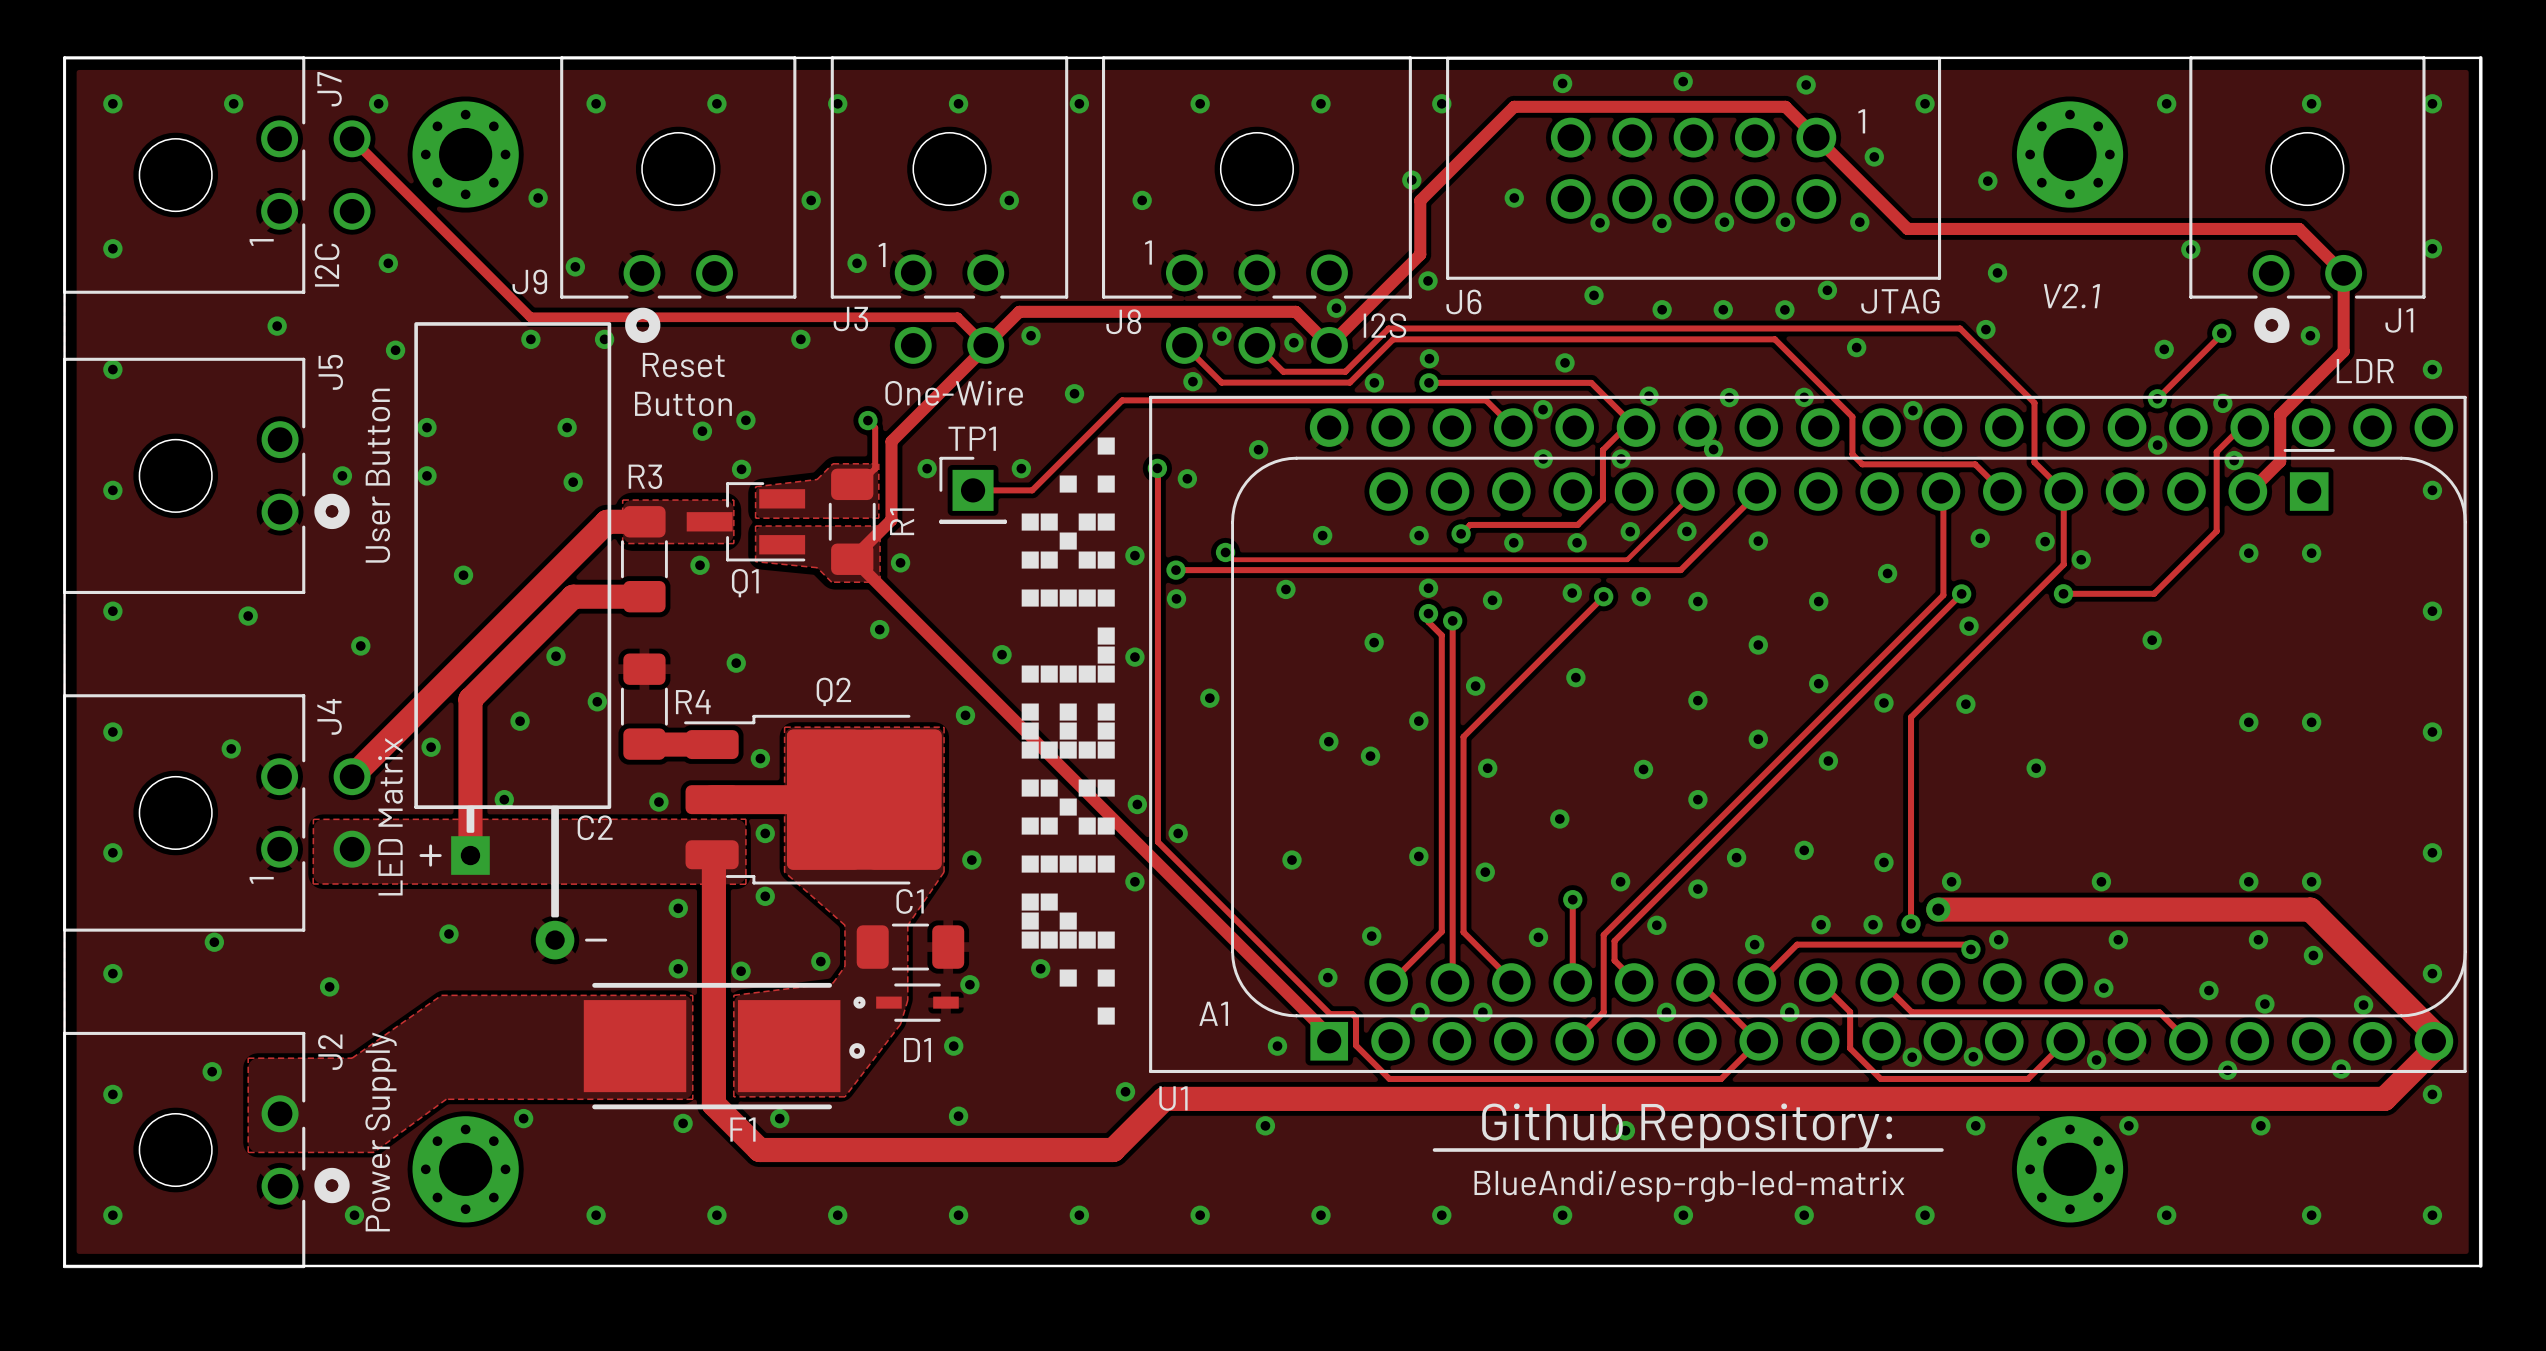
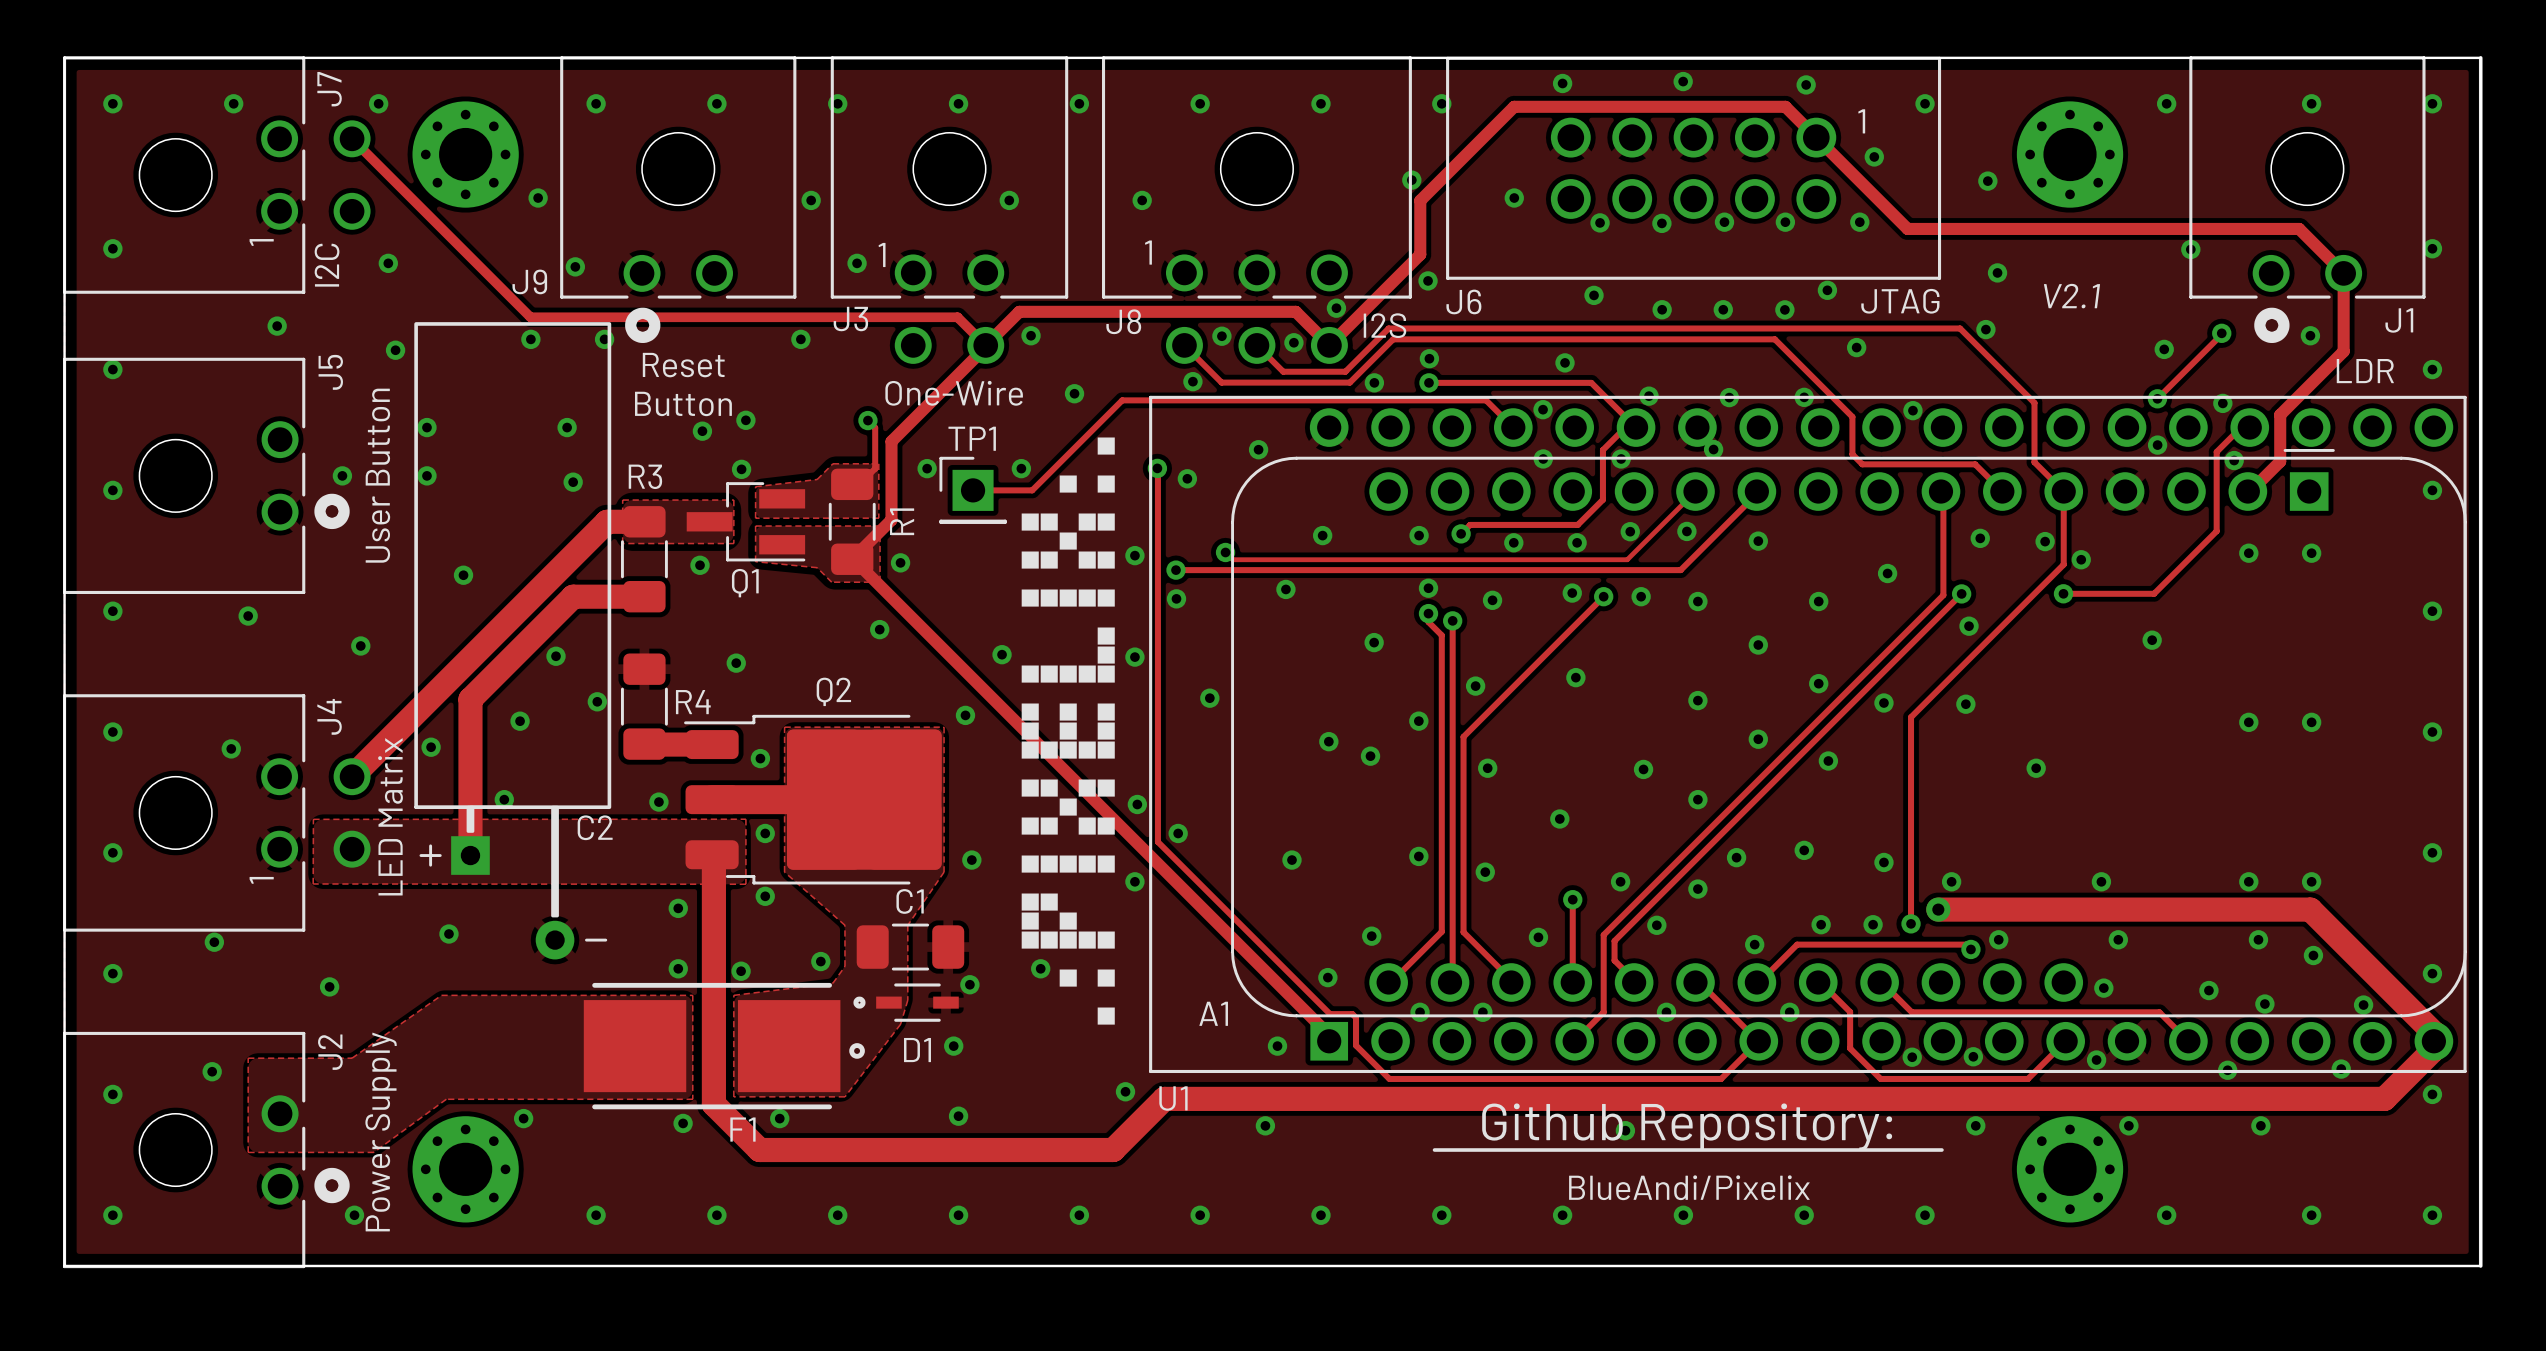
text: BlueAndi/esp-rgb-led-matrix (1689, 1186) -> BlueAndi/Pixelix (1689, 1187)

